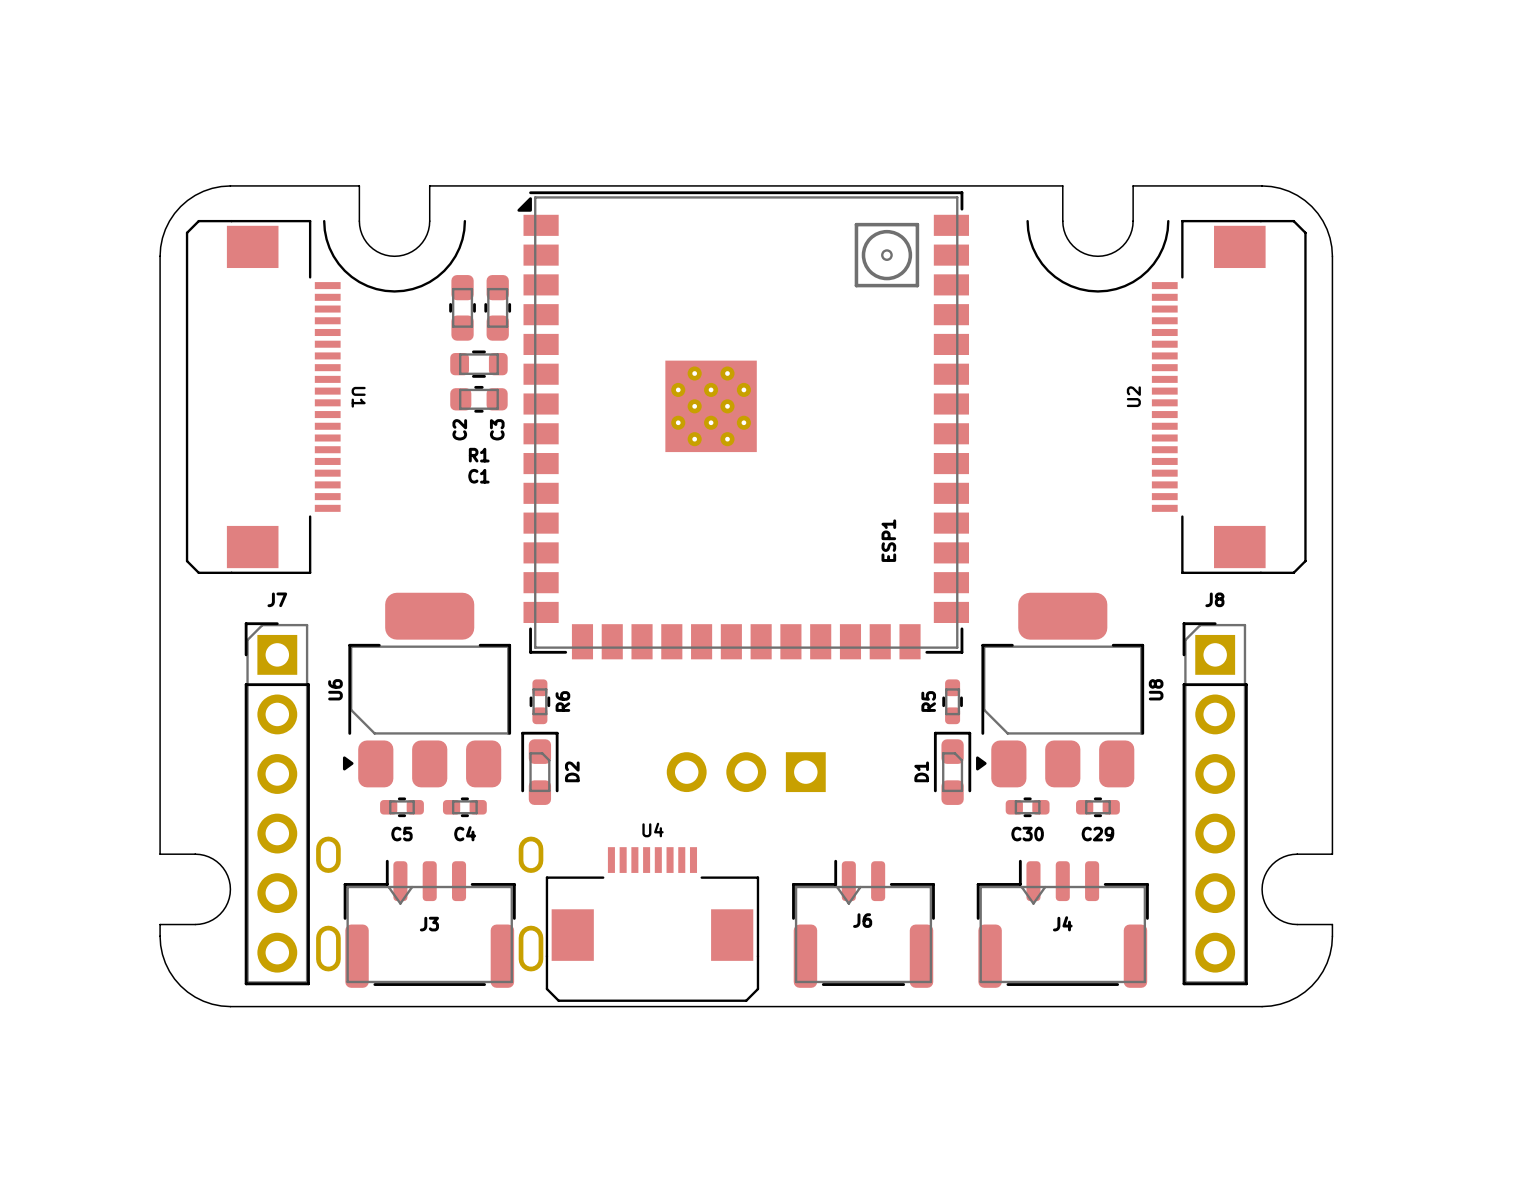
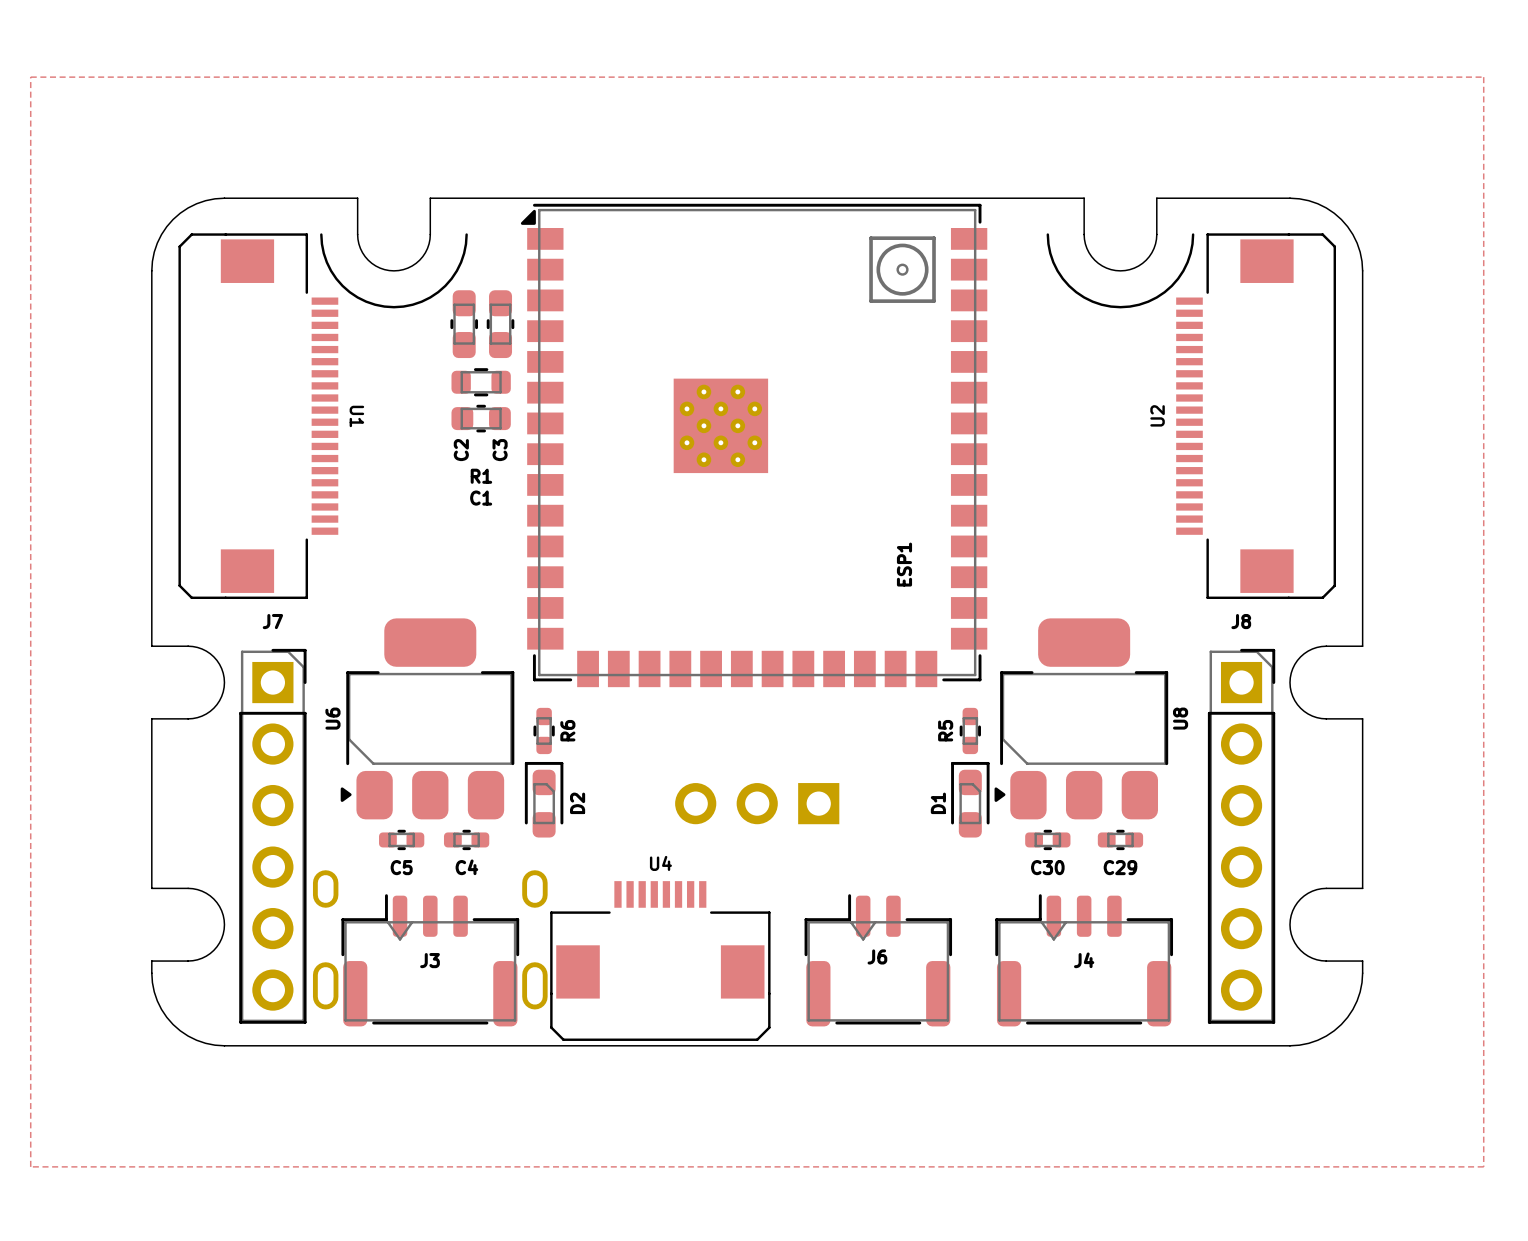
zone outline: none -> (30, 77) (1483, 77) (1483, 1166) (30, 1166) (30, 77)
board edge: (160, 619) (160, 690) -> (151, 646) (192, 646) (206, 651) (219, 664) (224, 682) (219, 700) (206, 714) (192, 718) (151, 718)
board edge: (1332, 619) (1332, 690) -> (1362, 646) (1321, 646) (1308, 651) (1294, 664) (1289, 682) (1294, 700) (1308, 714) (1321, 718) (1362, 718)
J7 footprint: [244, 622, 310, 986] -> [239, 648, 307, 1024]
J8 footprint: [1182, 622, 1248, 986] -> [1207, 648, 1276, 1024]

